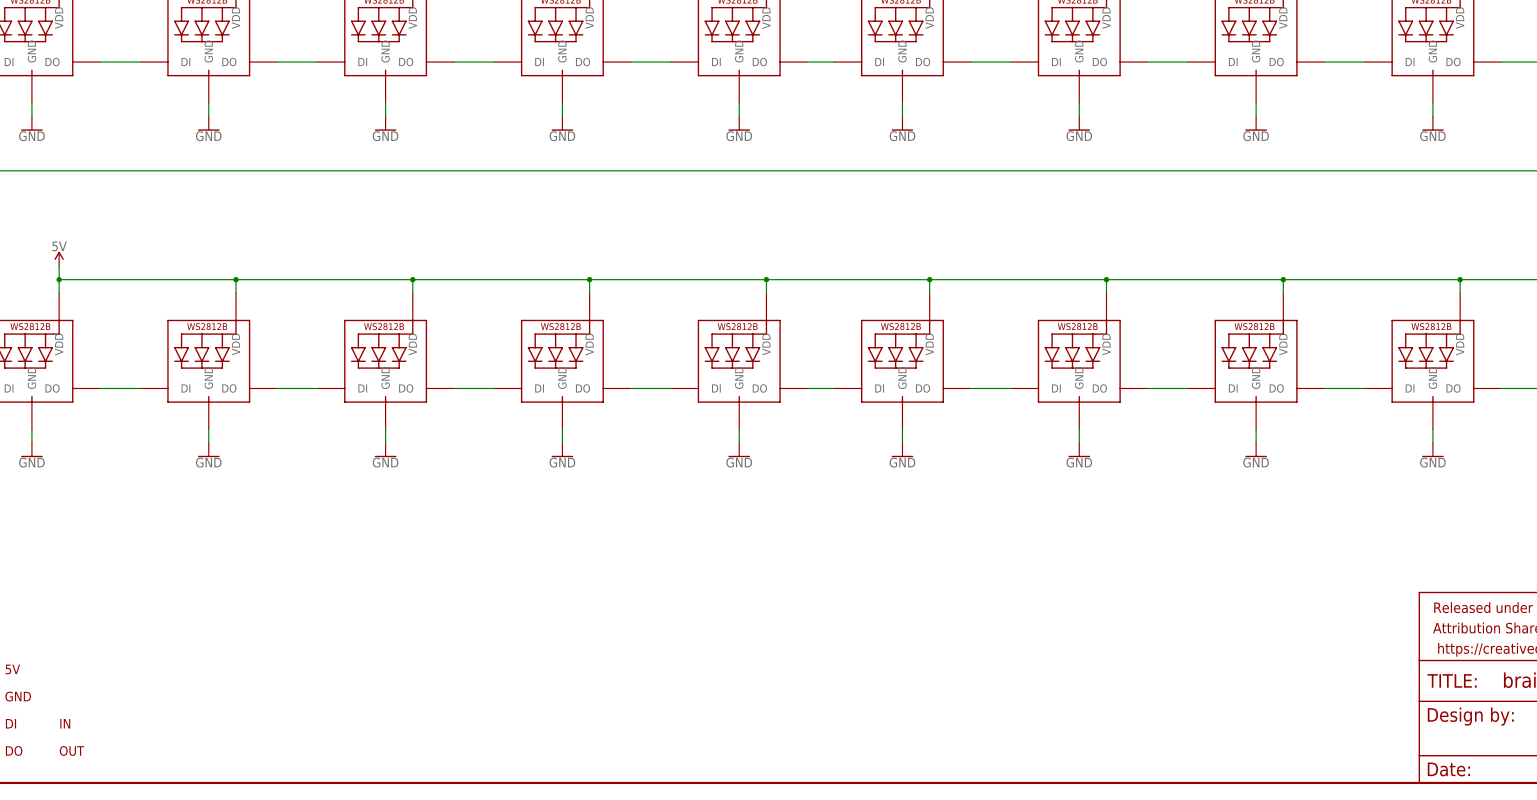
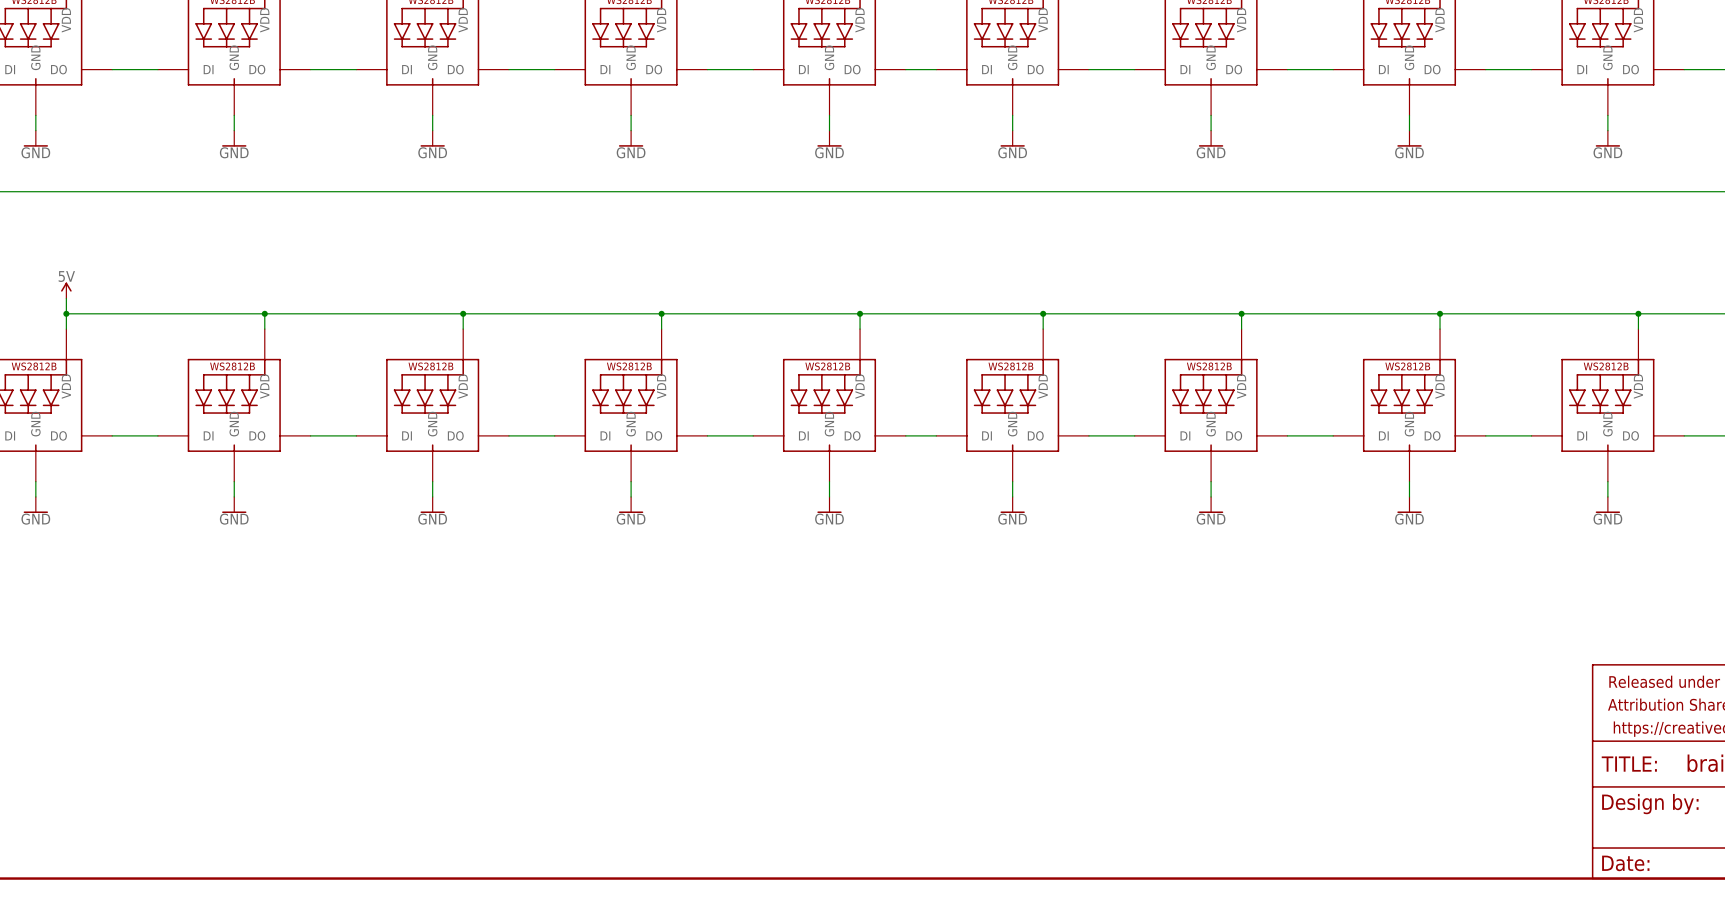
part: (12, 669) -> none
part: (18, 696) -> none
part: (11, 723) -> none
part: (65, 723) -> none
part: (14, 750) -> none
part: (72, 750) -> none

